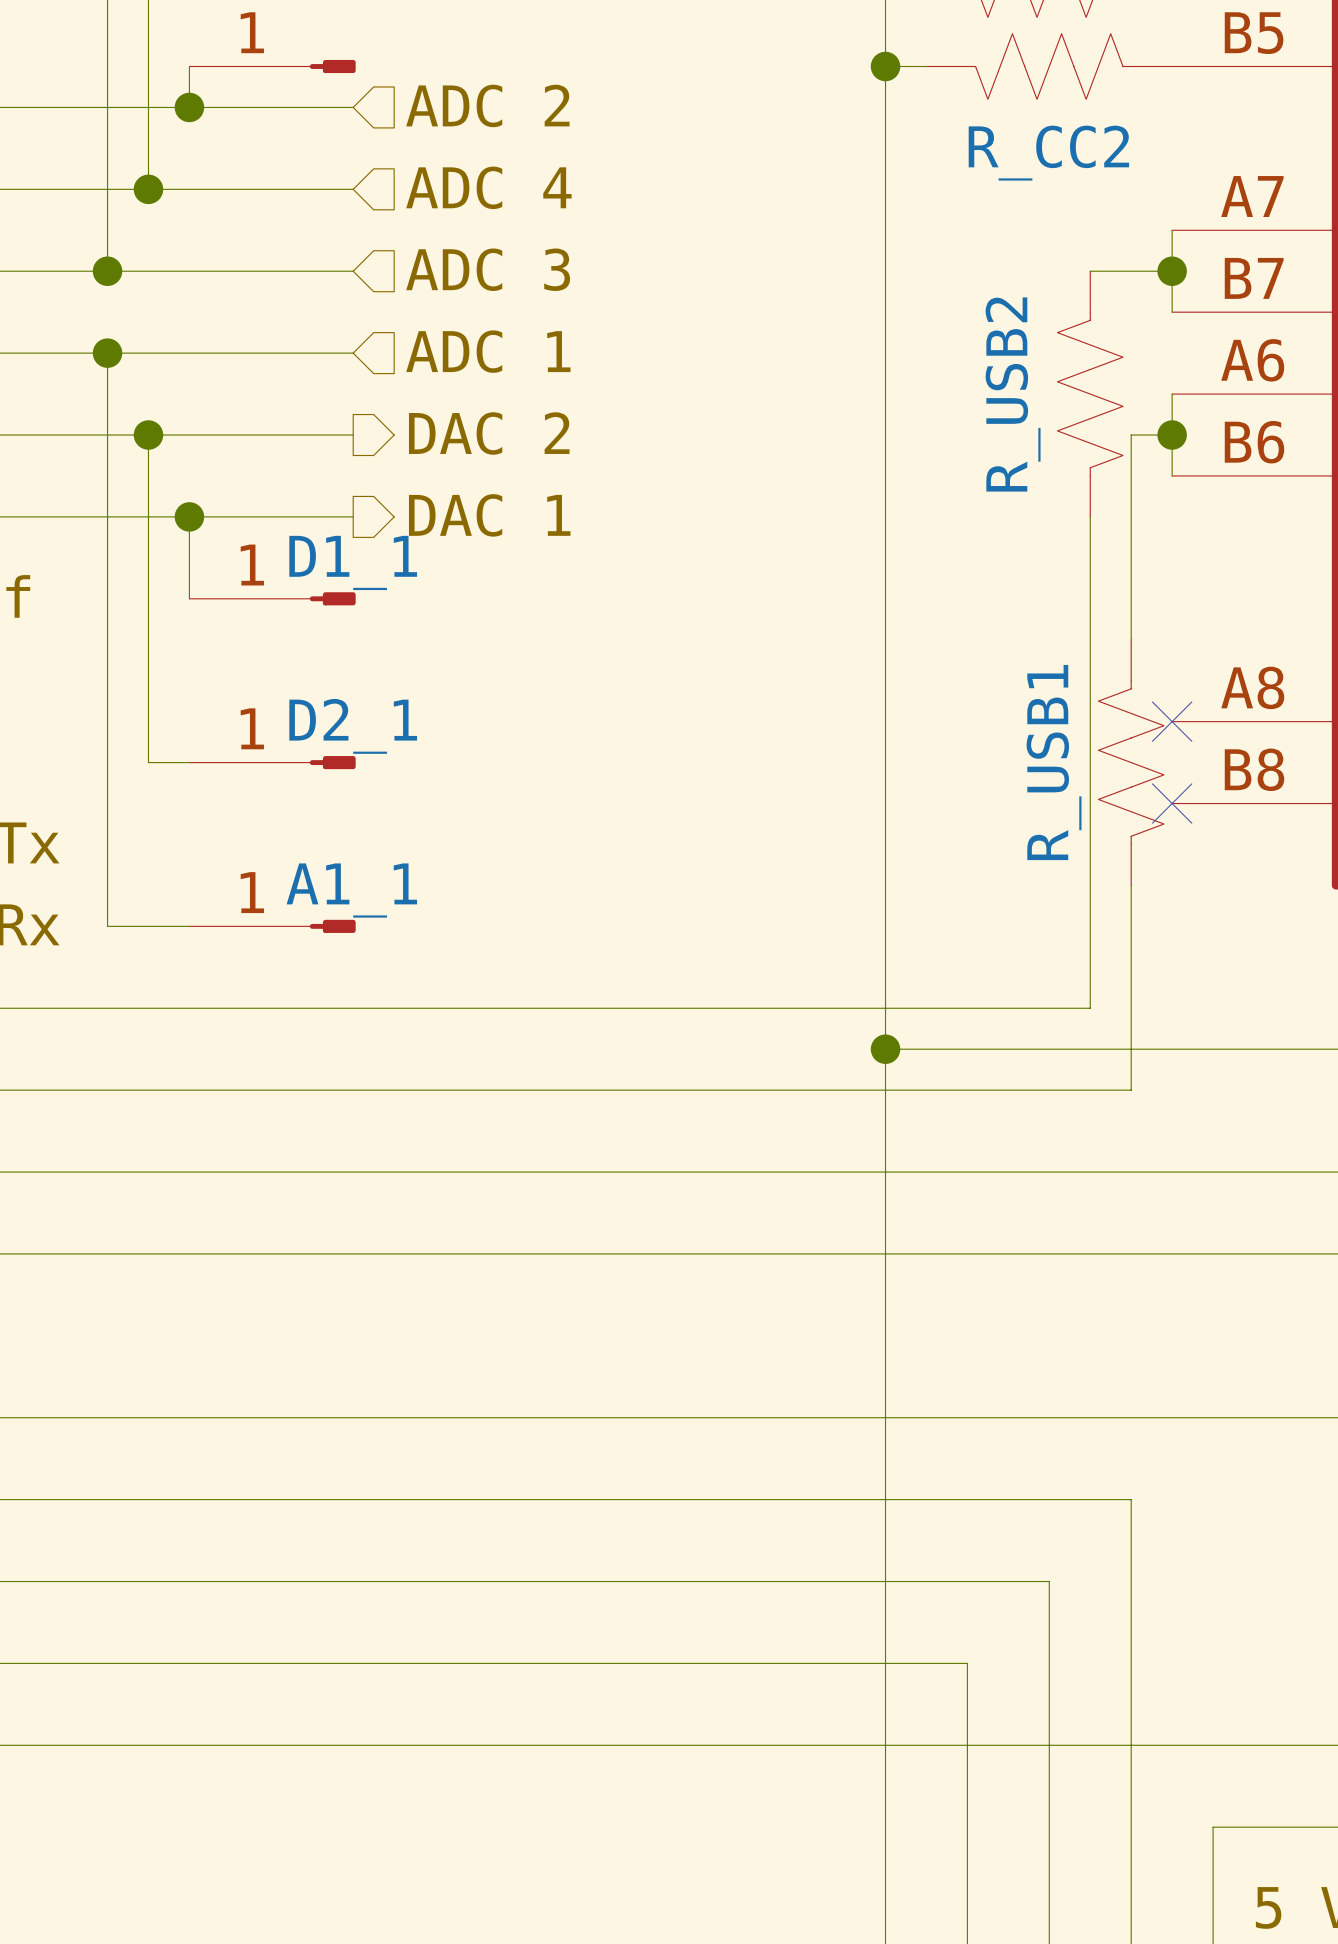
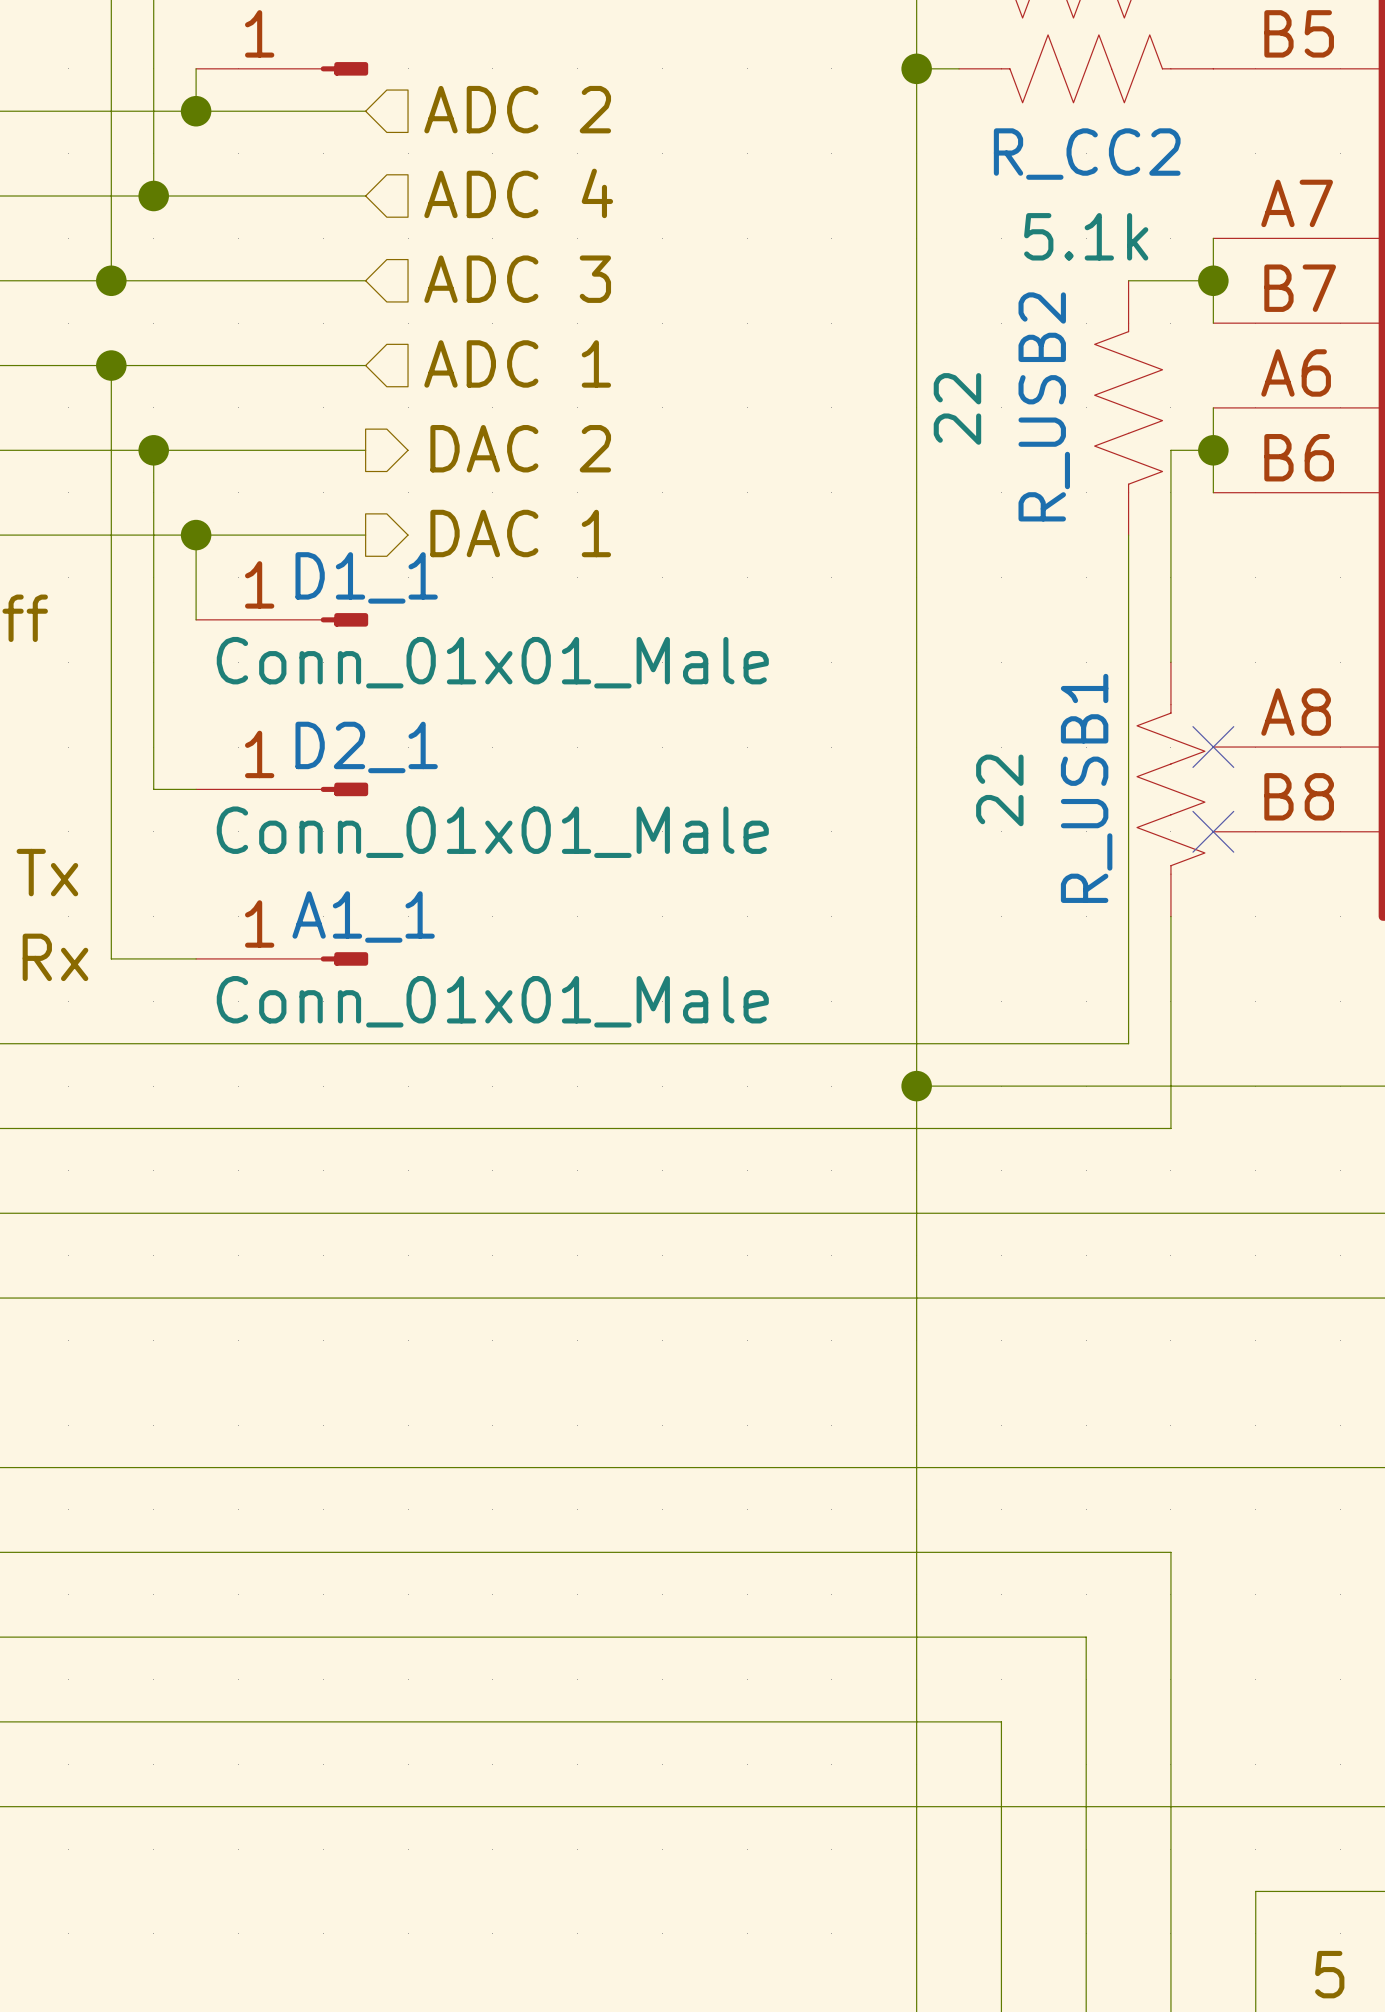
R_CC2 value: none -> 5.1k (1086, 236)
R_USB2 value: none -> 22 (957, 408)
D1_1 value: none -> Conn_01x01_Male (492, 662)
R_USB1 value: none -> 22 (999, 790)
D2_1 value: none -> Conn_01x01_Male (492, 832)
A1_1 value: none -> Conn_01x01_Male (492, 1001)

